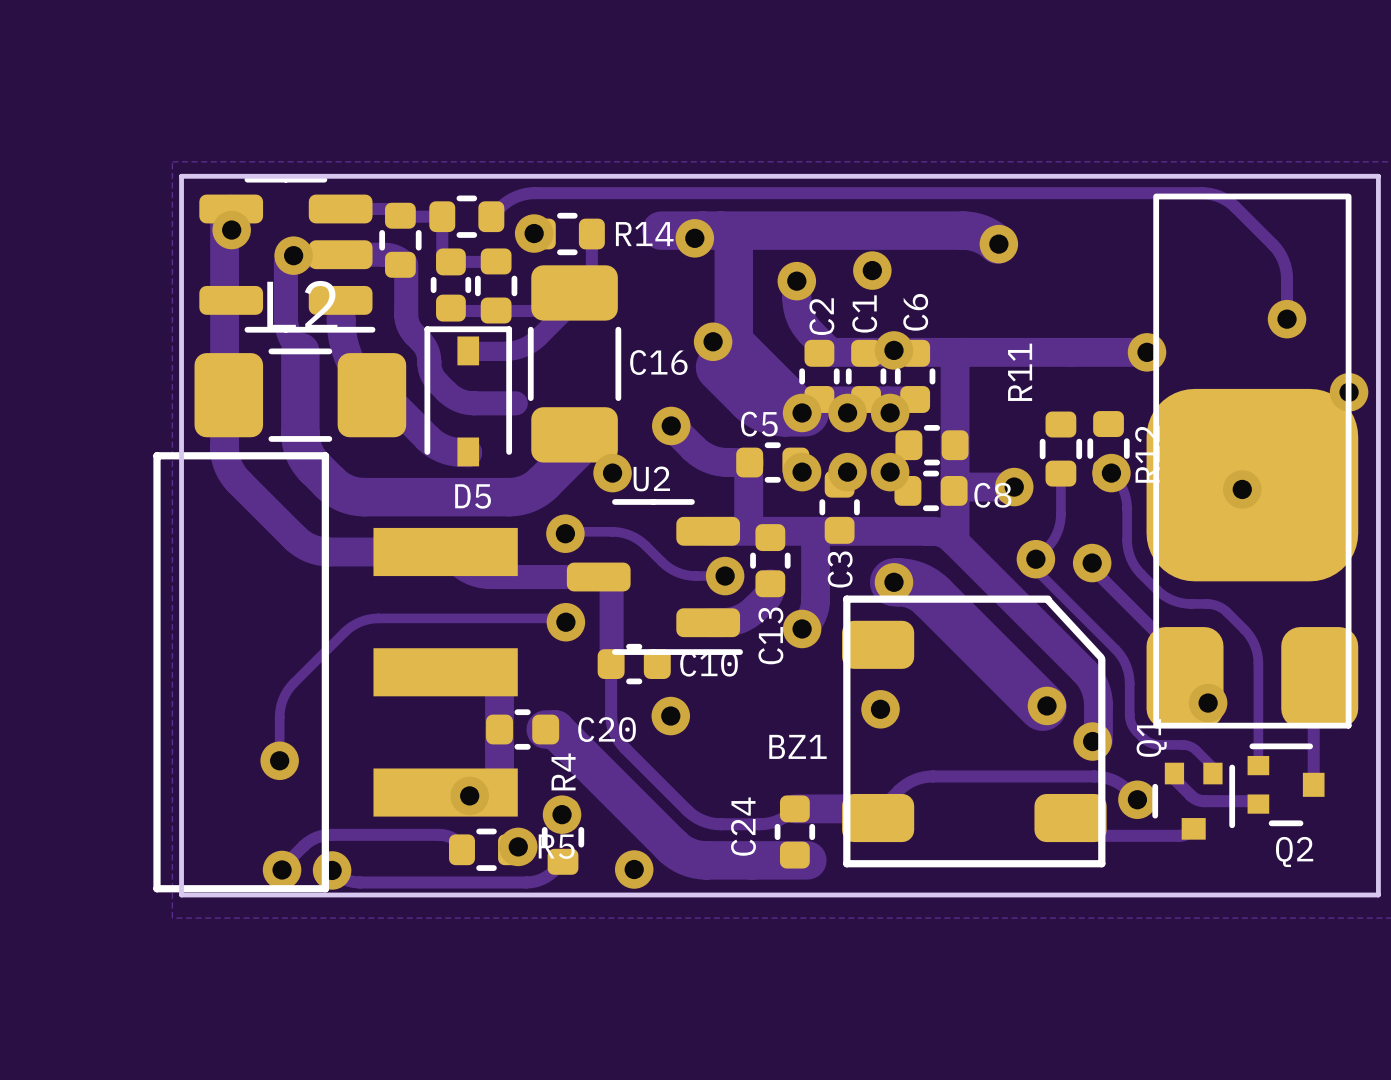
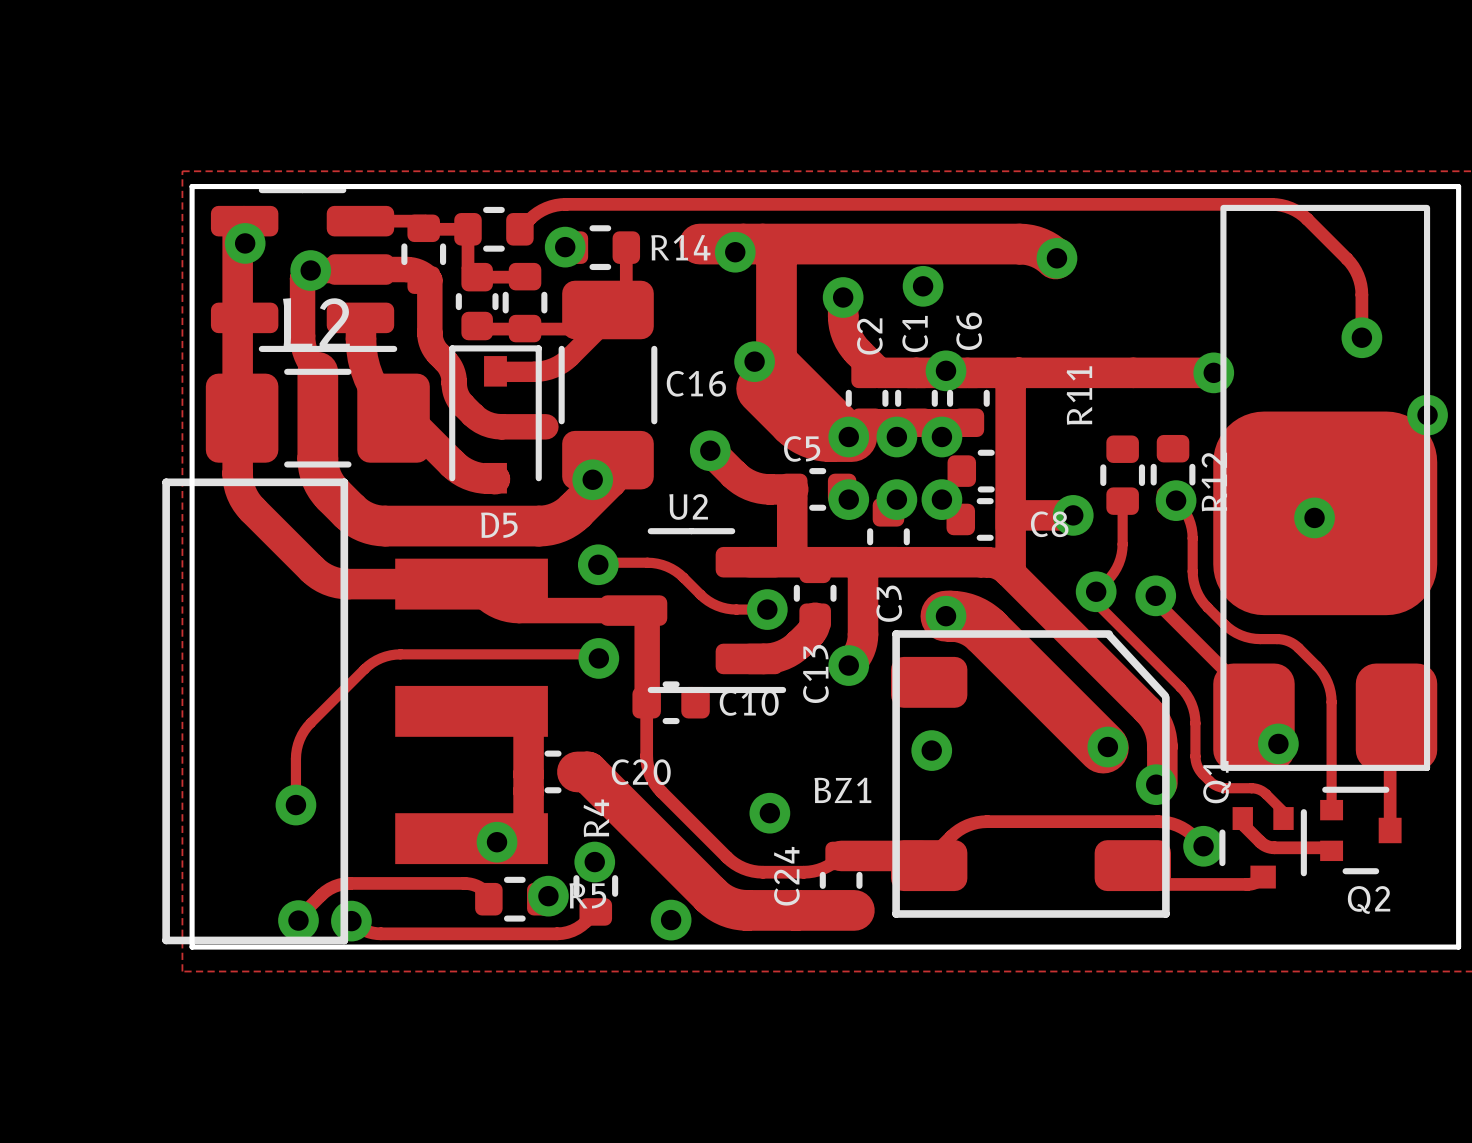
via position: (612, 473) -> (592, 479)
via position: (670, 716) -> (769, 813)

